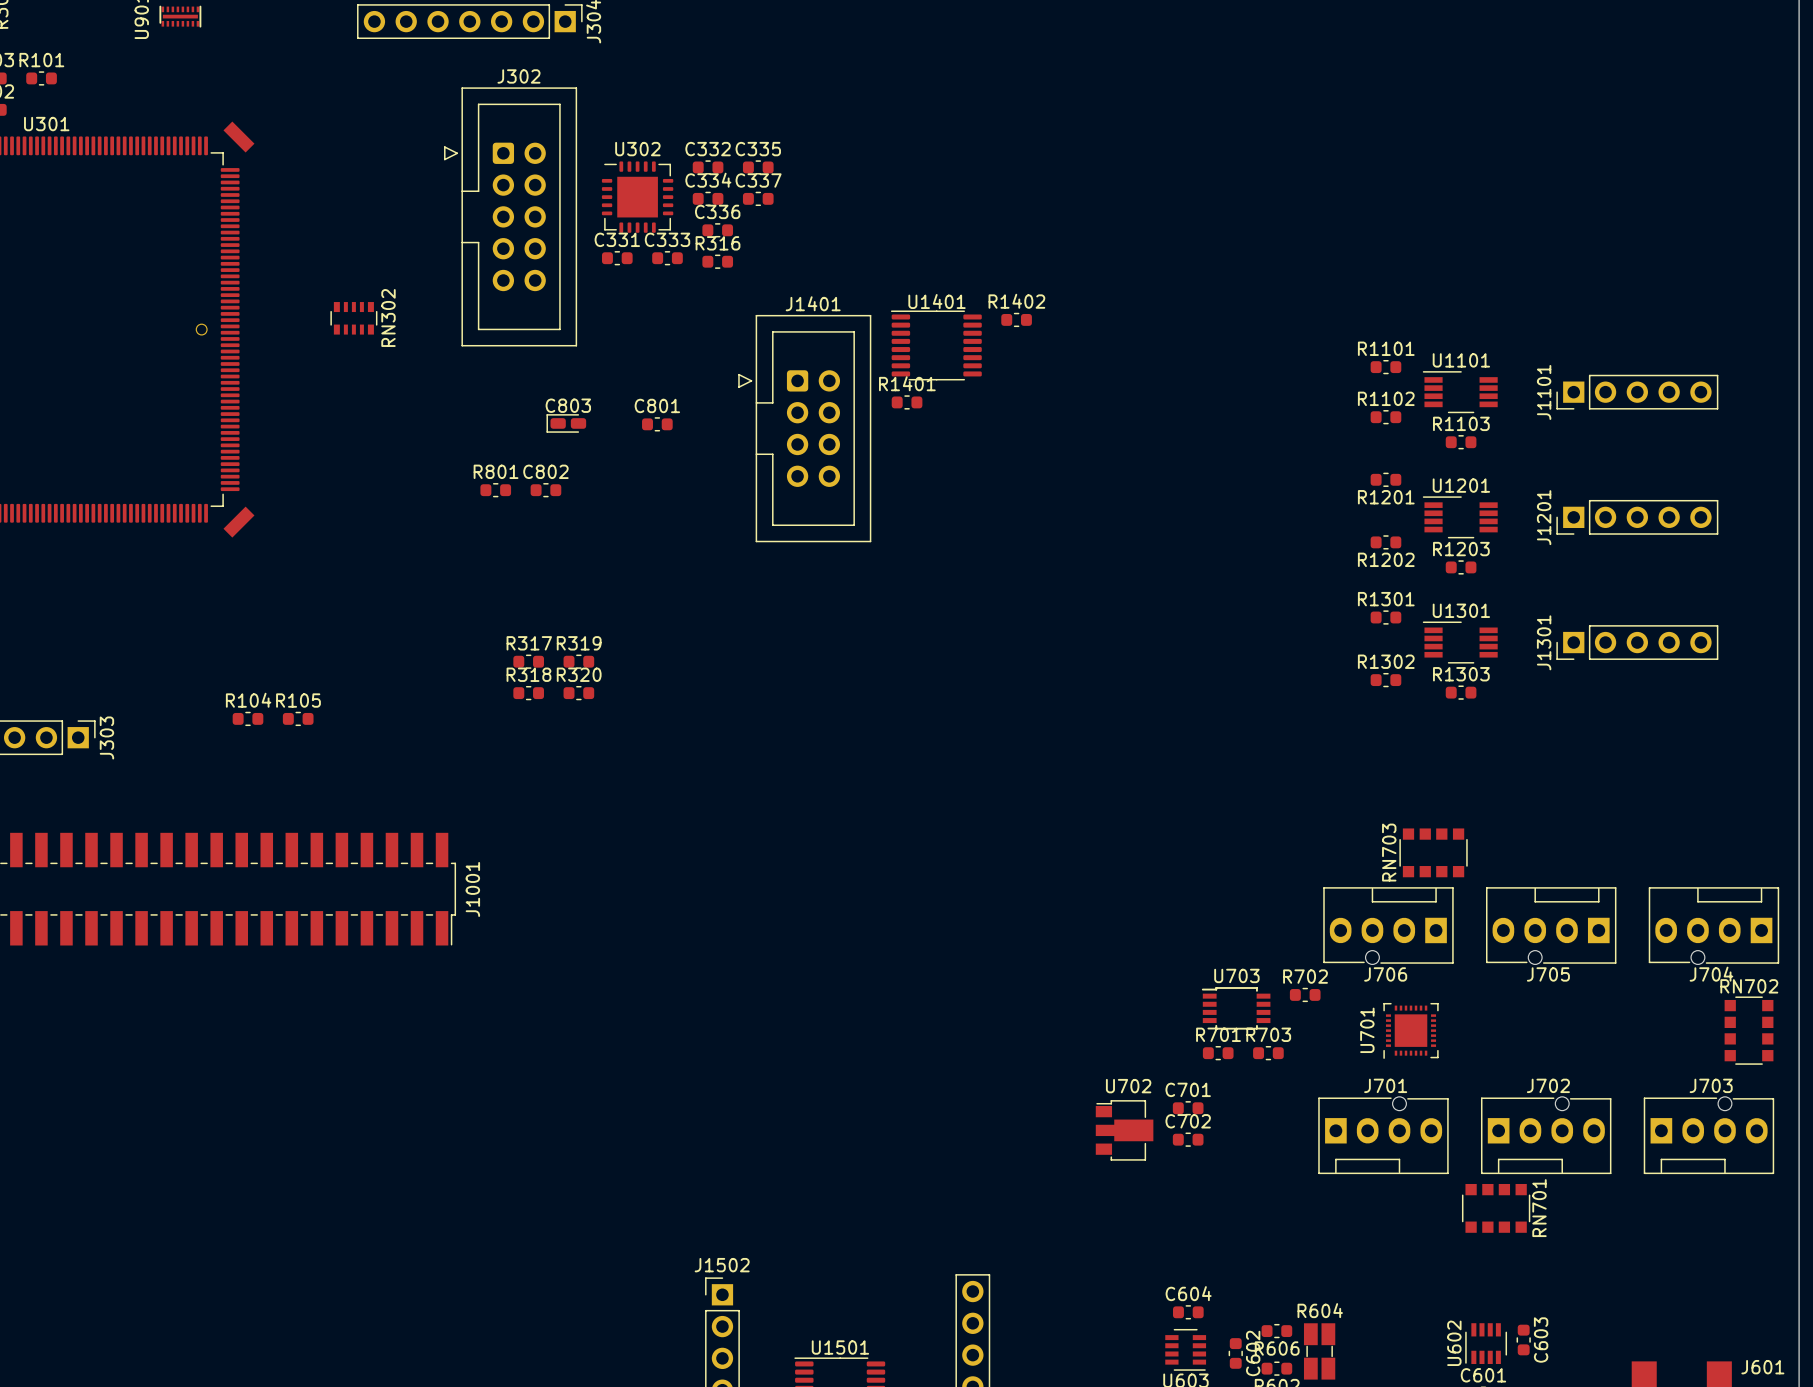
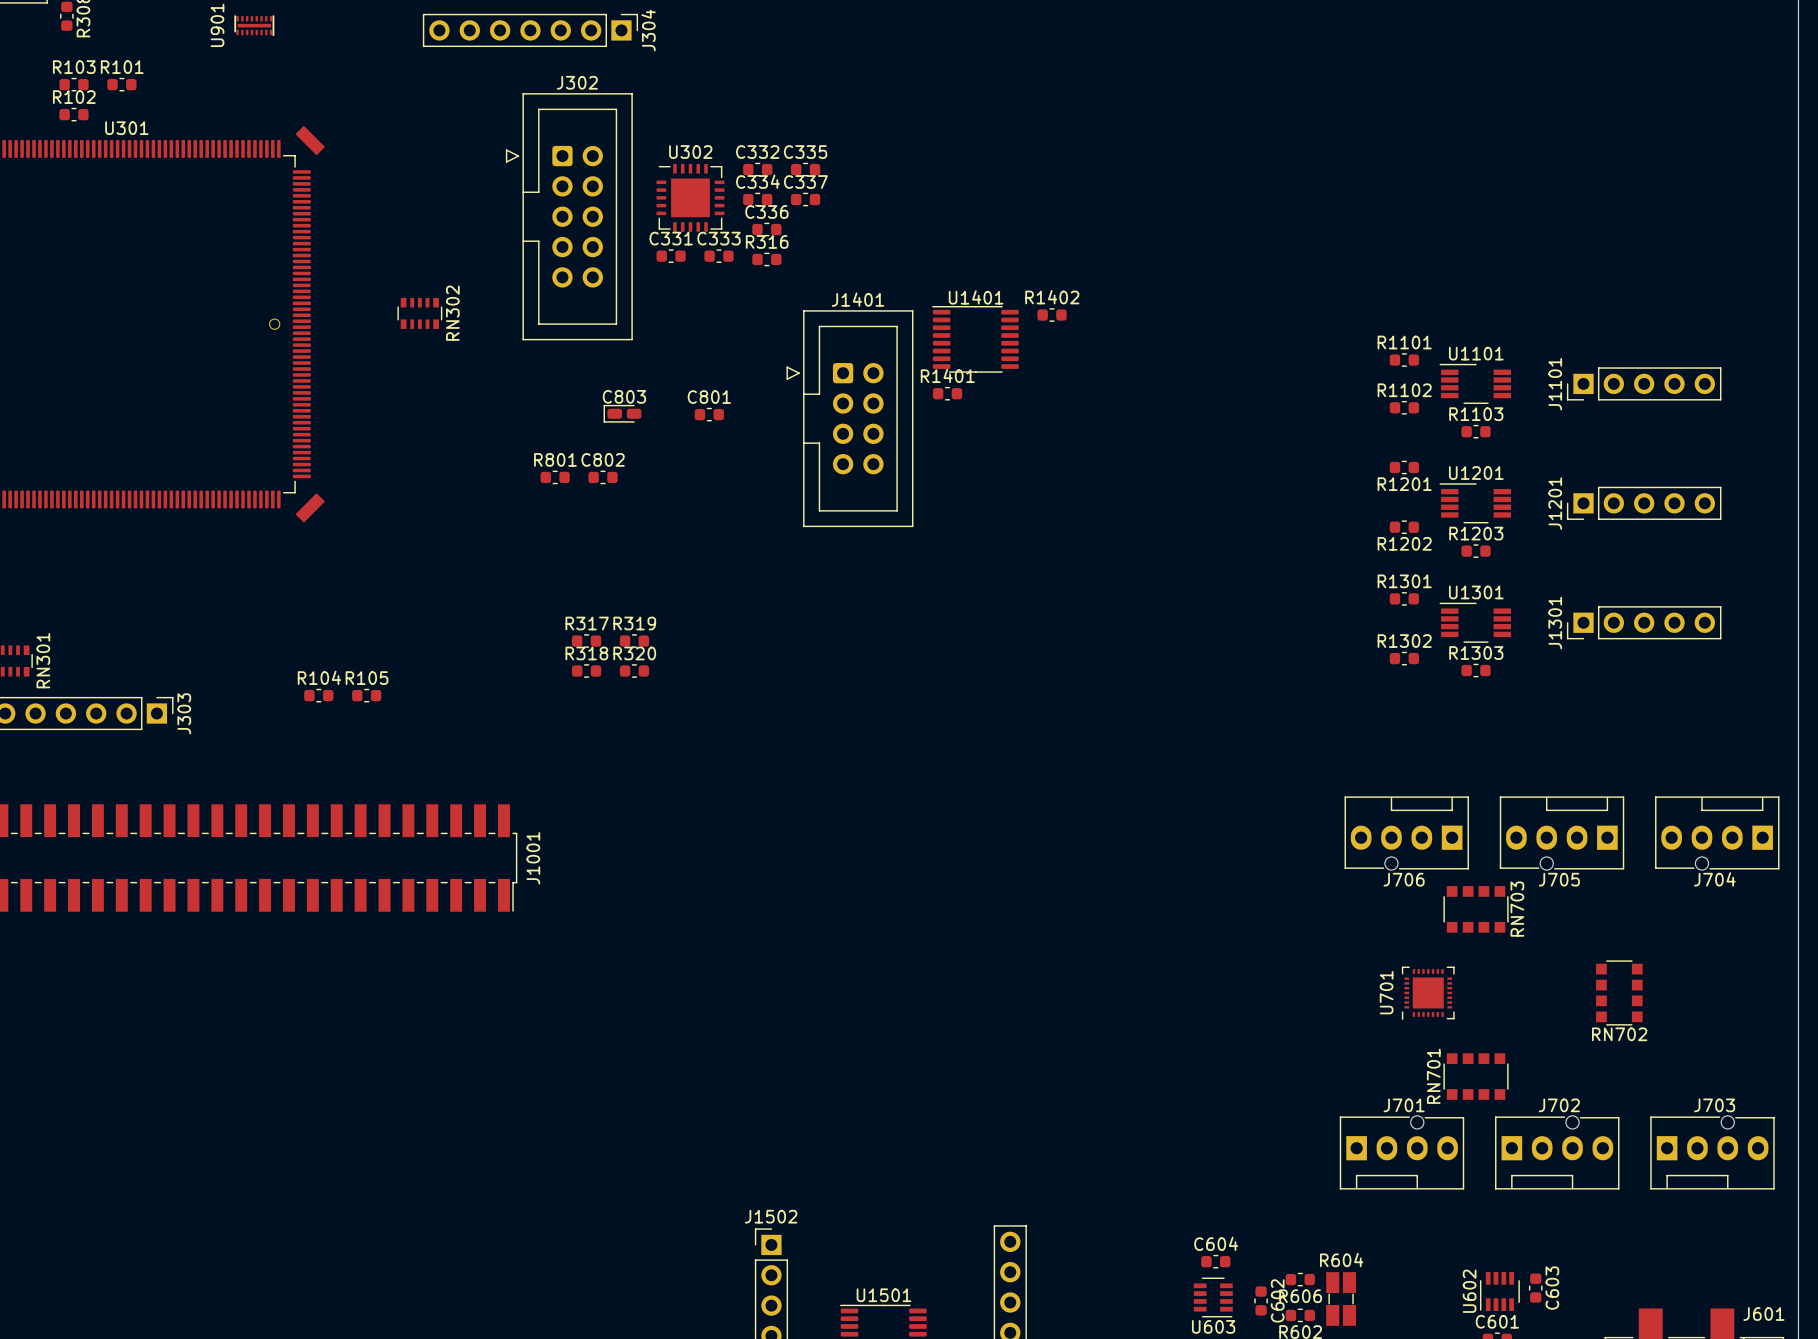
RN703 name position: RN703 (1389, 852) -> RN703 (1517, 909)
RN703 position: (1433, 852) -> (1476, 909)
J706 position: (1388, 925) -> (1406, 833)
J705 position: (1551, 925) -> (1562, 833)
J704 position: (1713, 925) -> (1717, 833)
RN702 name position: RN702 (1749, 986) -> RN702 (1619, 1034)
R702: (1305, 994) -> none
U703: (1236, 1008) -> none
RN702 position: (1749, 1030) -> (1619, 992)
R701: (1218, 1053) -> none
R703: (1268, 1053) -> none
C701: (1188, 1108) -> none
U702: (1124, 1130) -> none
J701 position: (1383, 1135) -> (1401, 1152)
J702 position: (1546, 1135) -> (1557, 1152)
J703 position: (1708, 1135) -> (1712, 1152)
C702: (1188, 1139) -> none
RN701 position: (1496, 1208) -> (1476, 1076)
RN701 name position: RN701 (1539, 1208) -> RN701 (1433, 1076)

